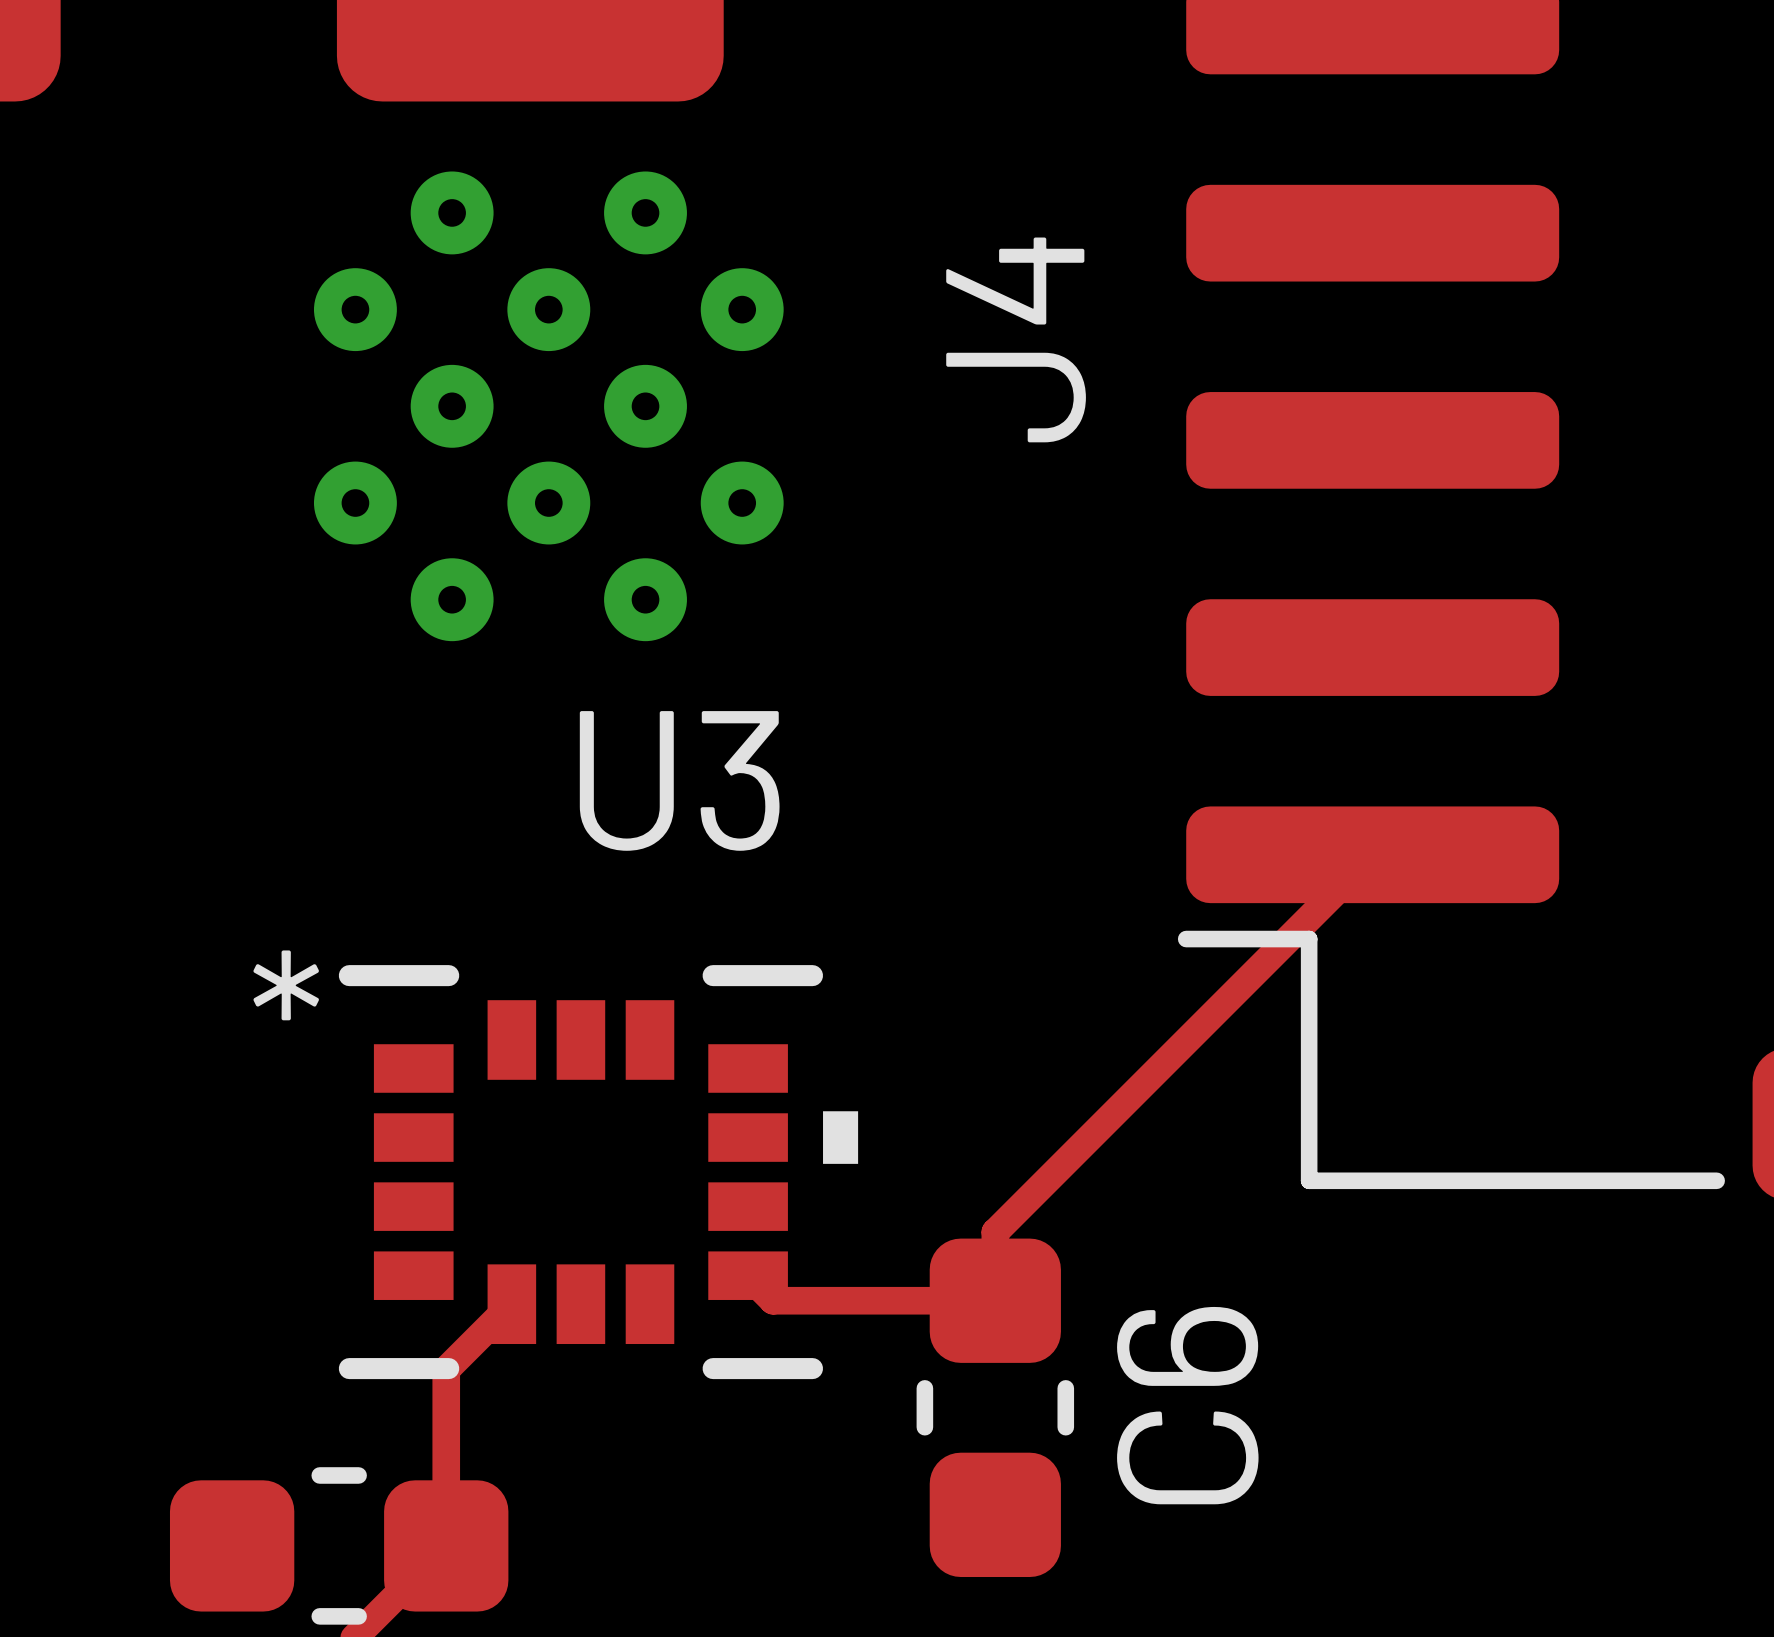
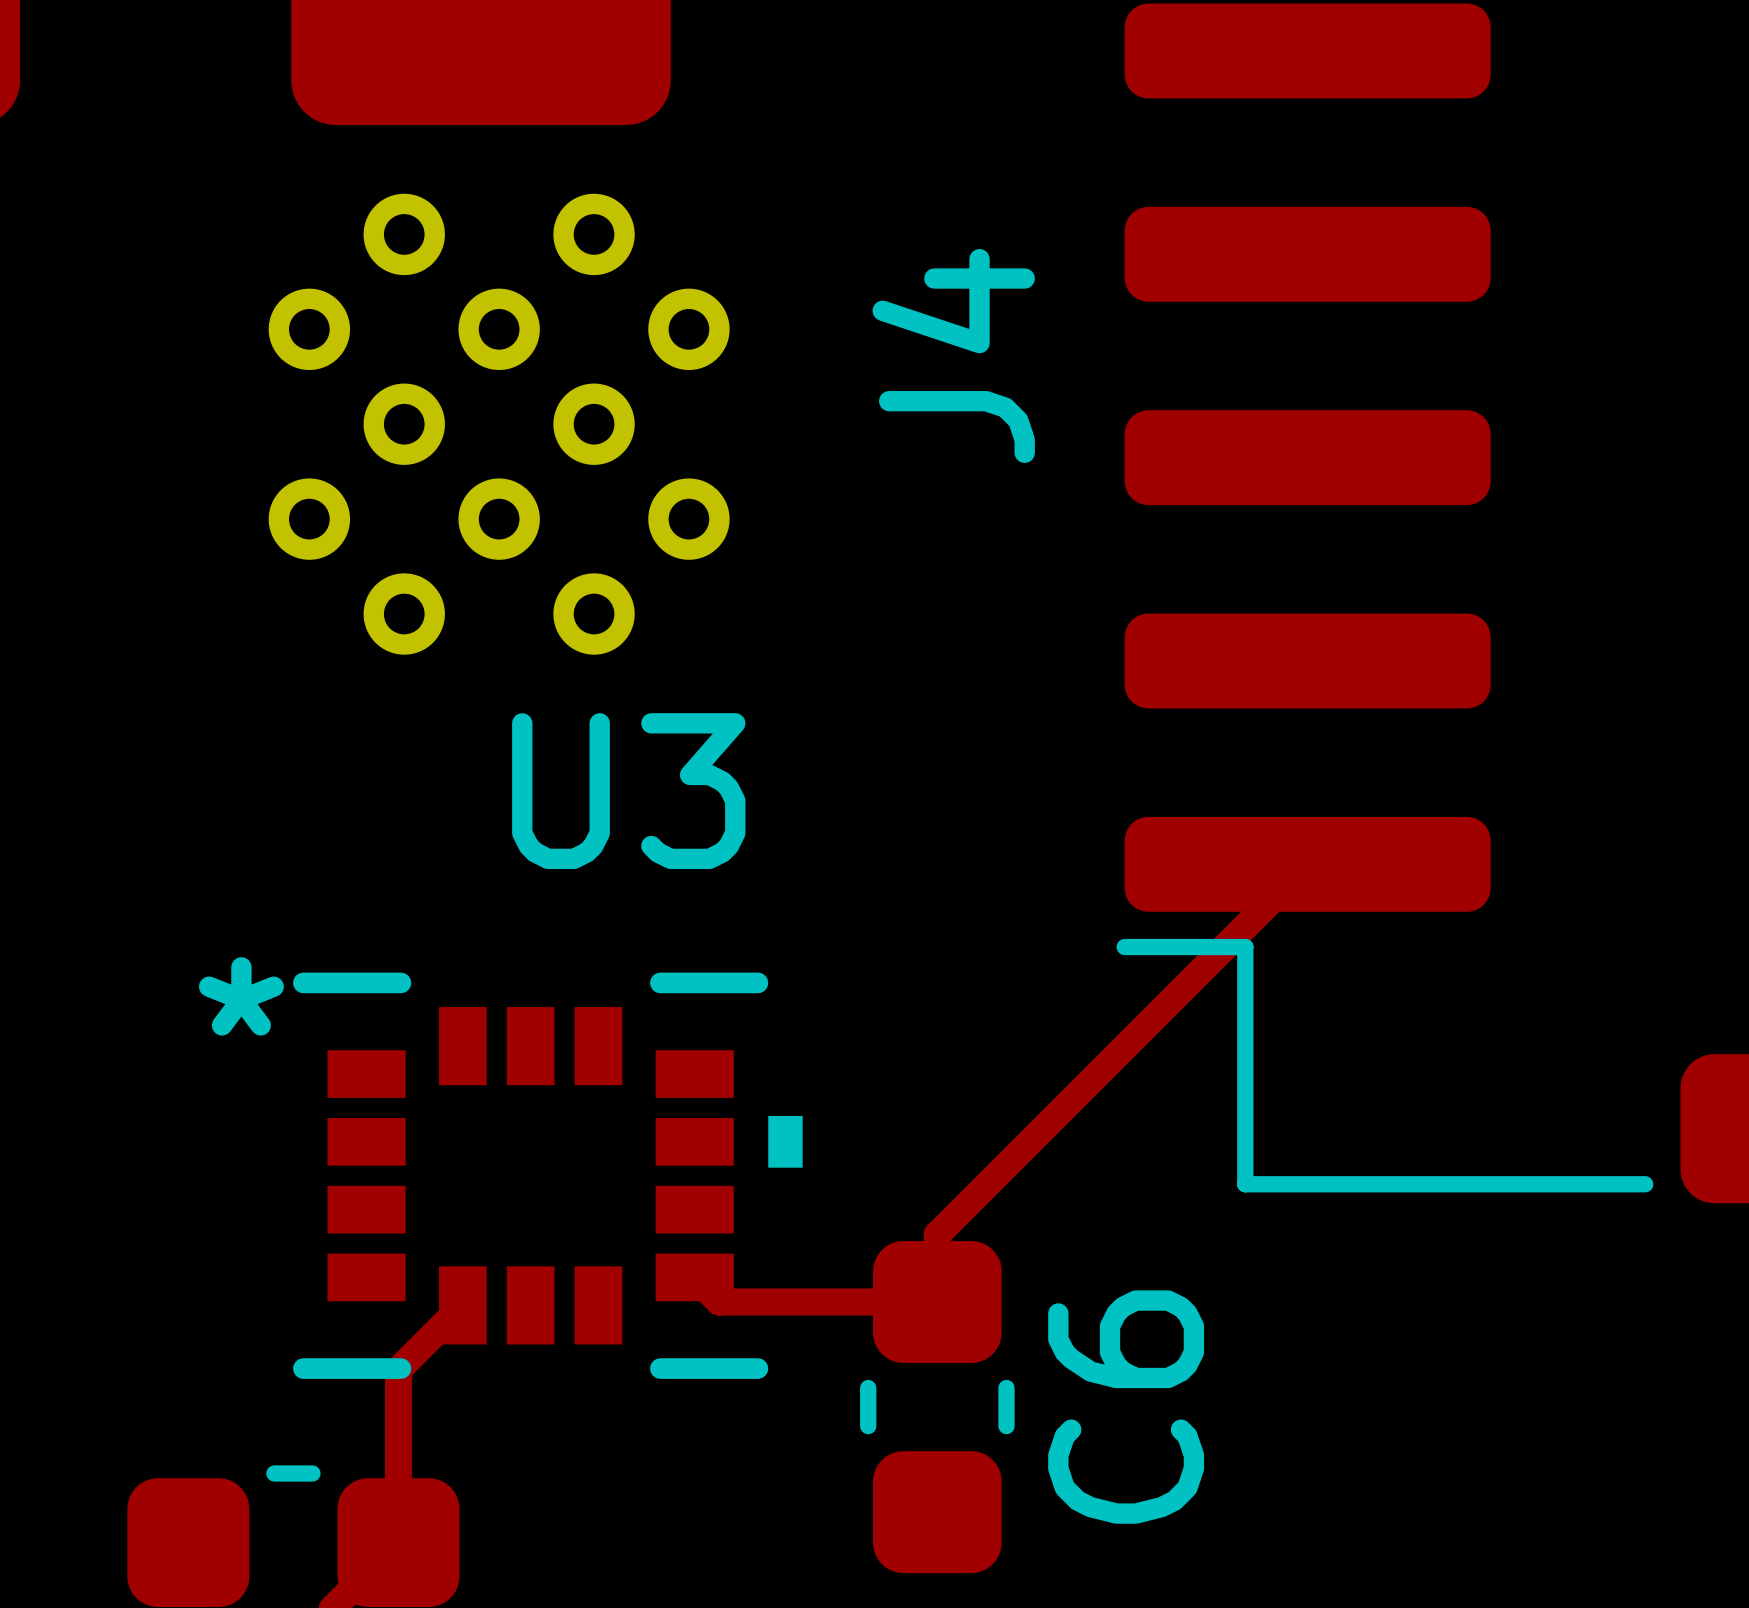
part footprint: [313, 171, 784, 642] -> [268, 193, 730, 655]

